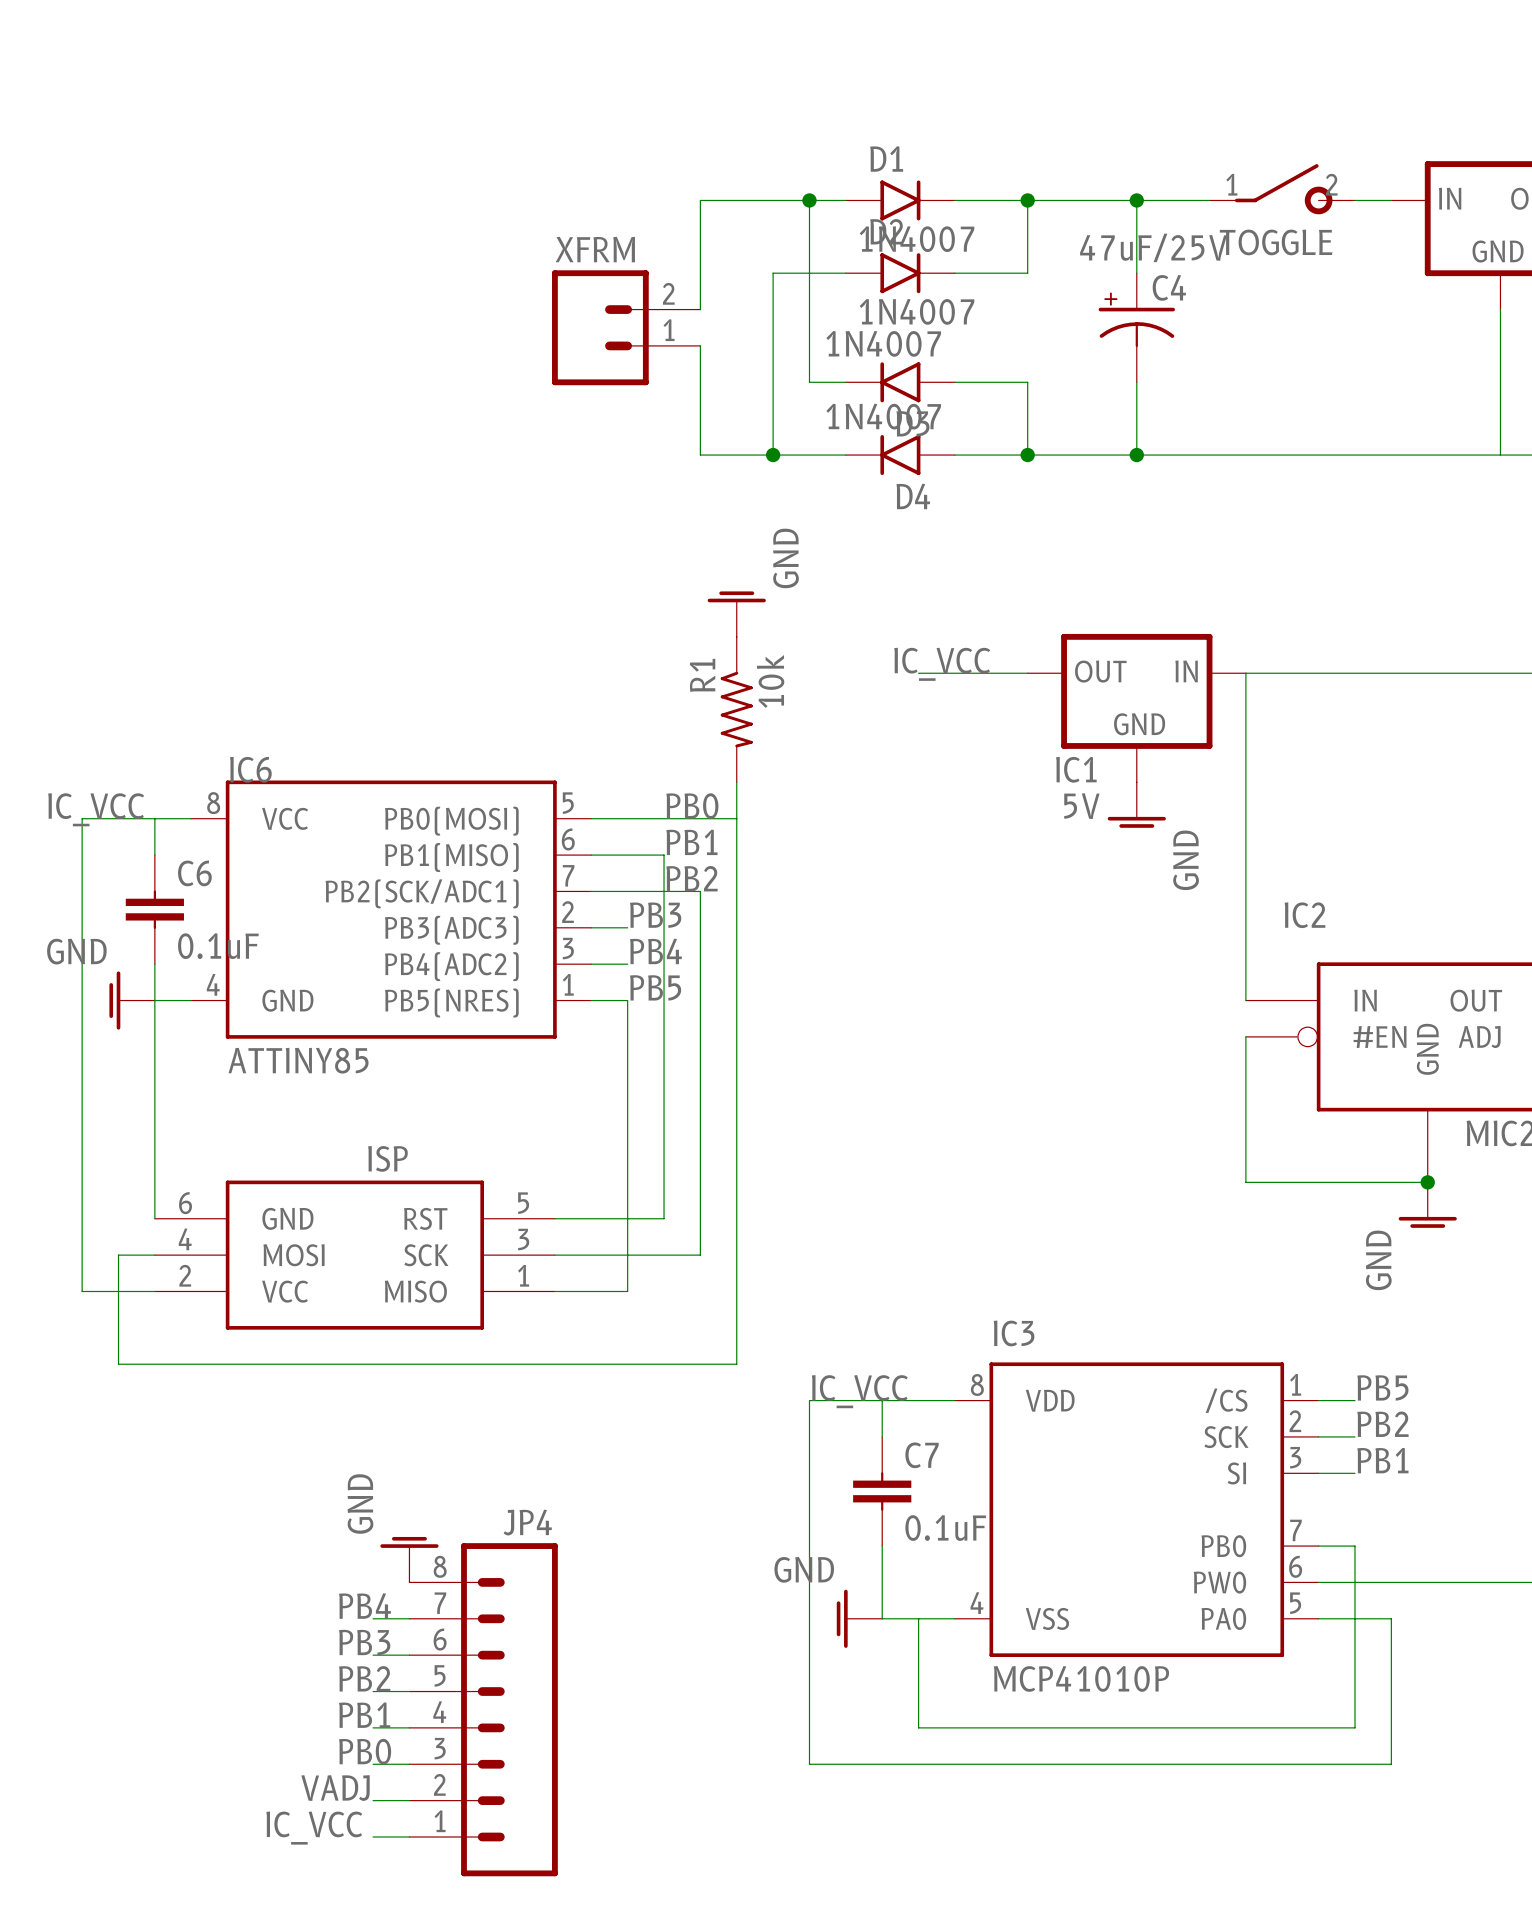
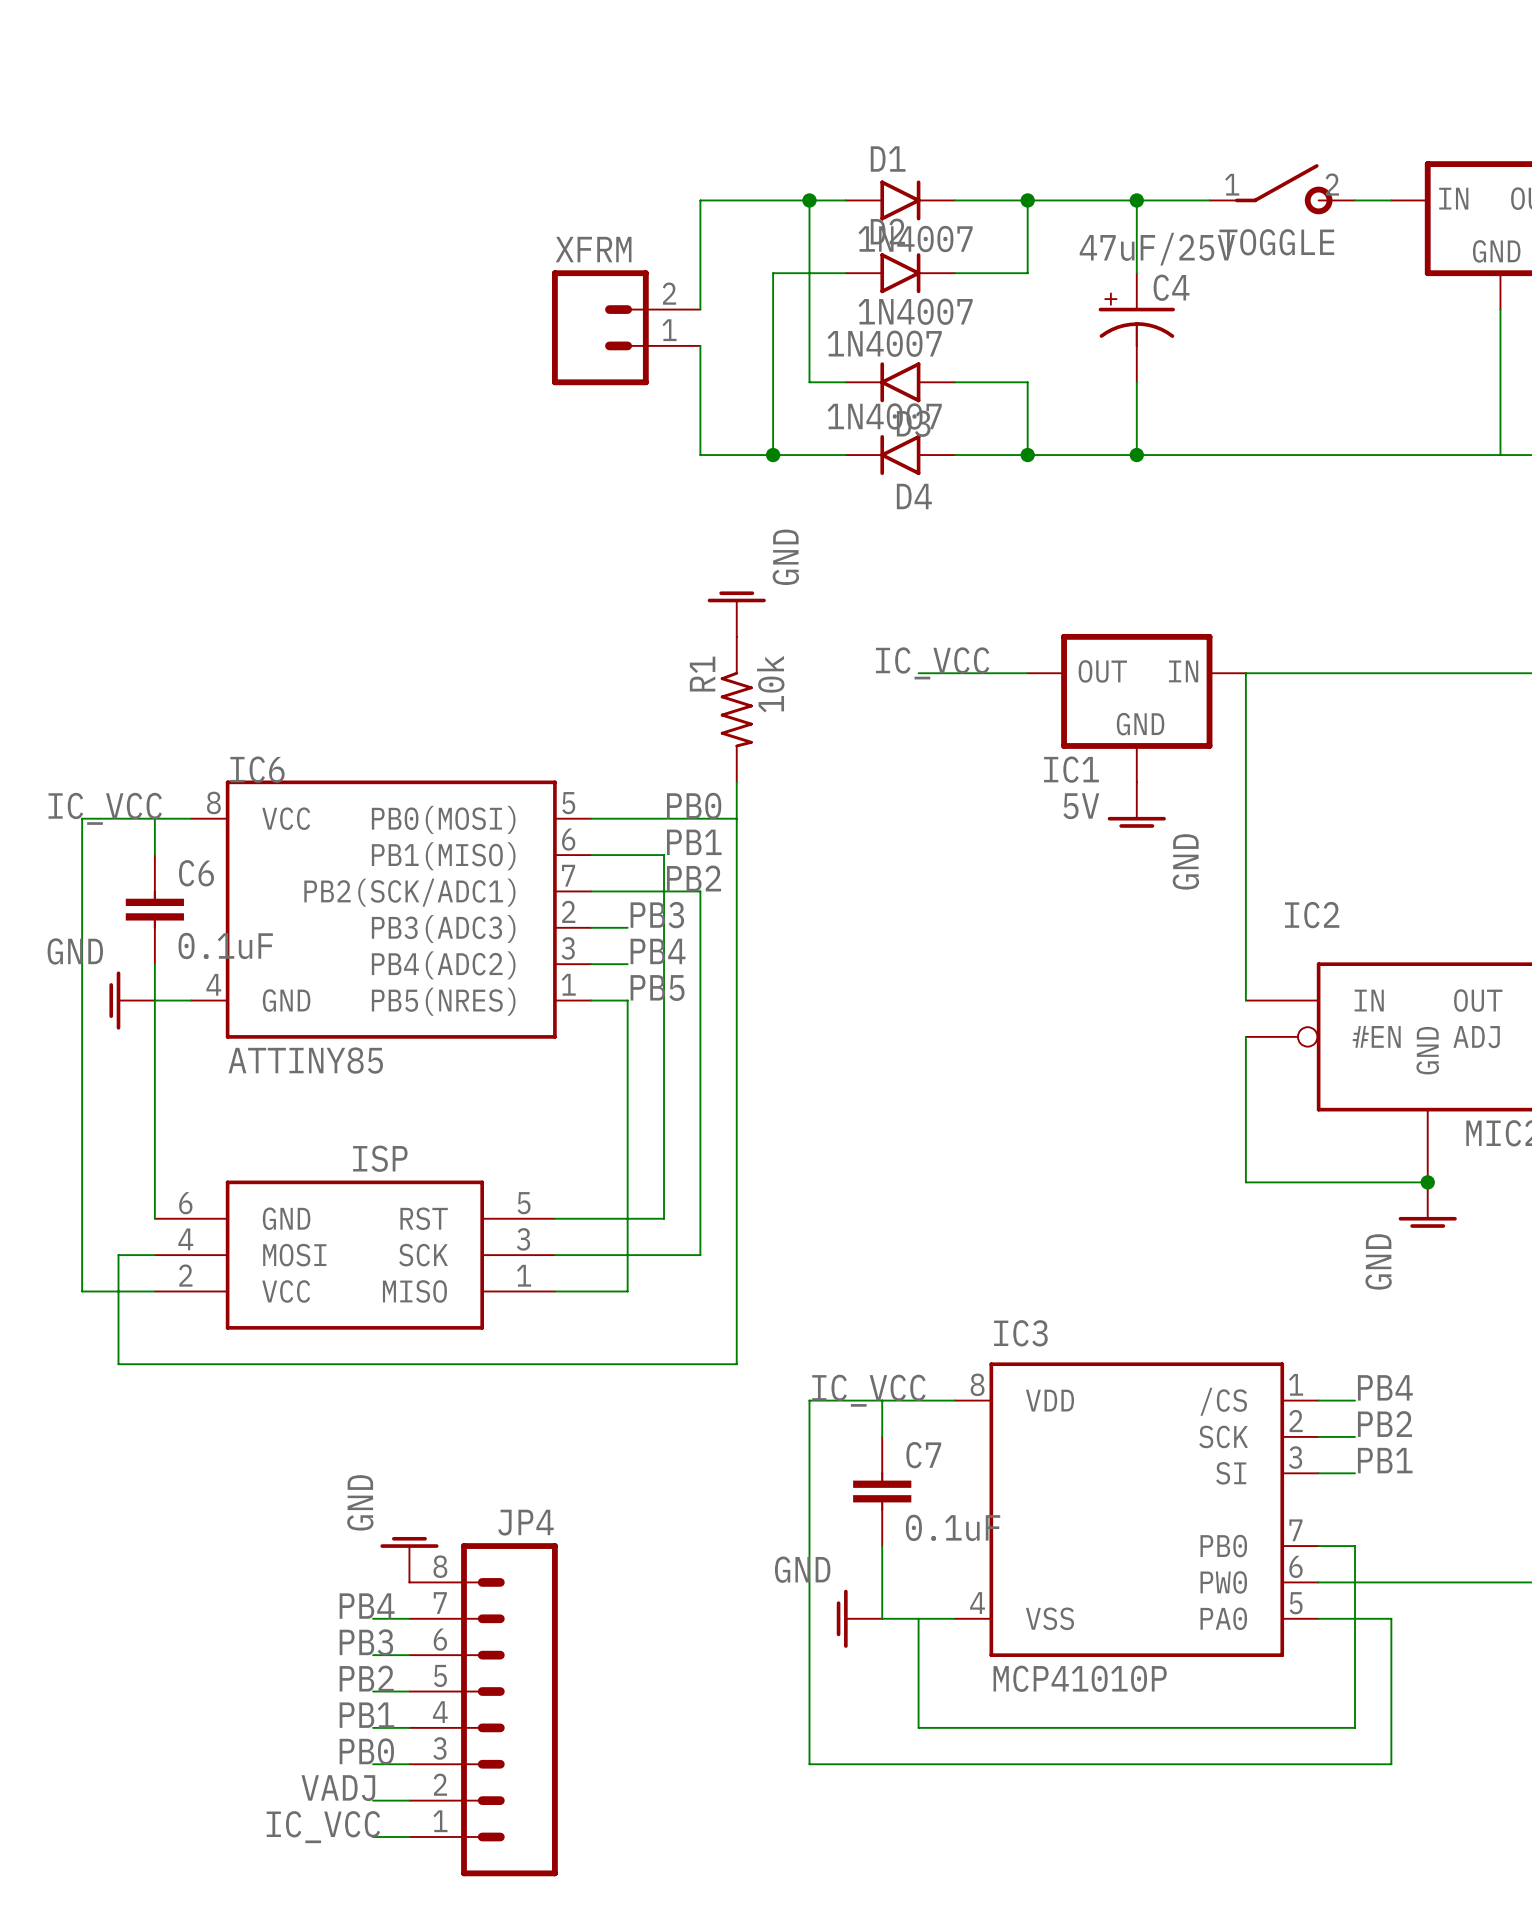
label: PB5 (1382, 1387) -> PB4 (1385, 1387)

